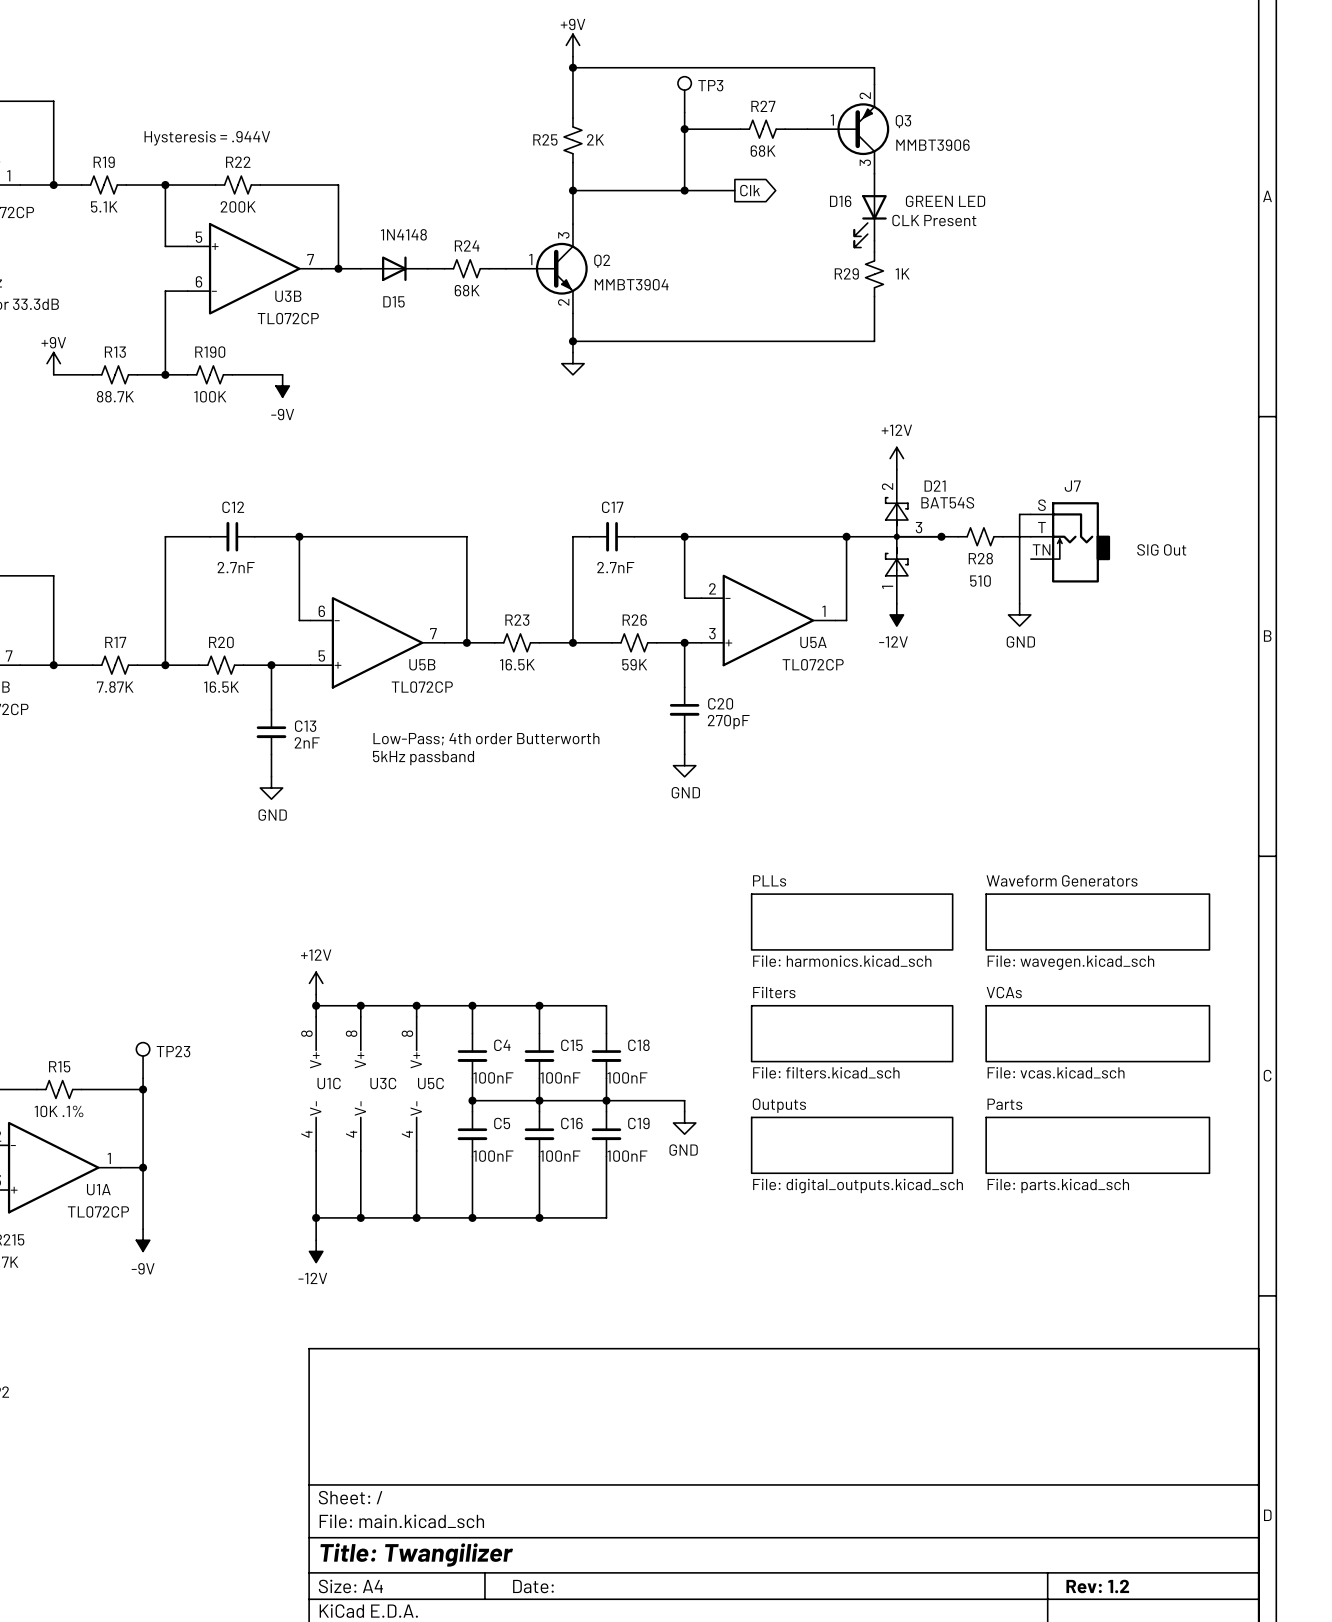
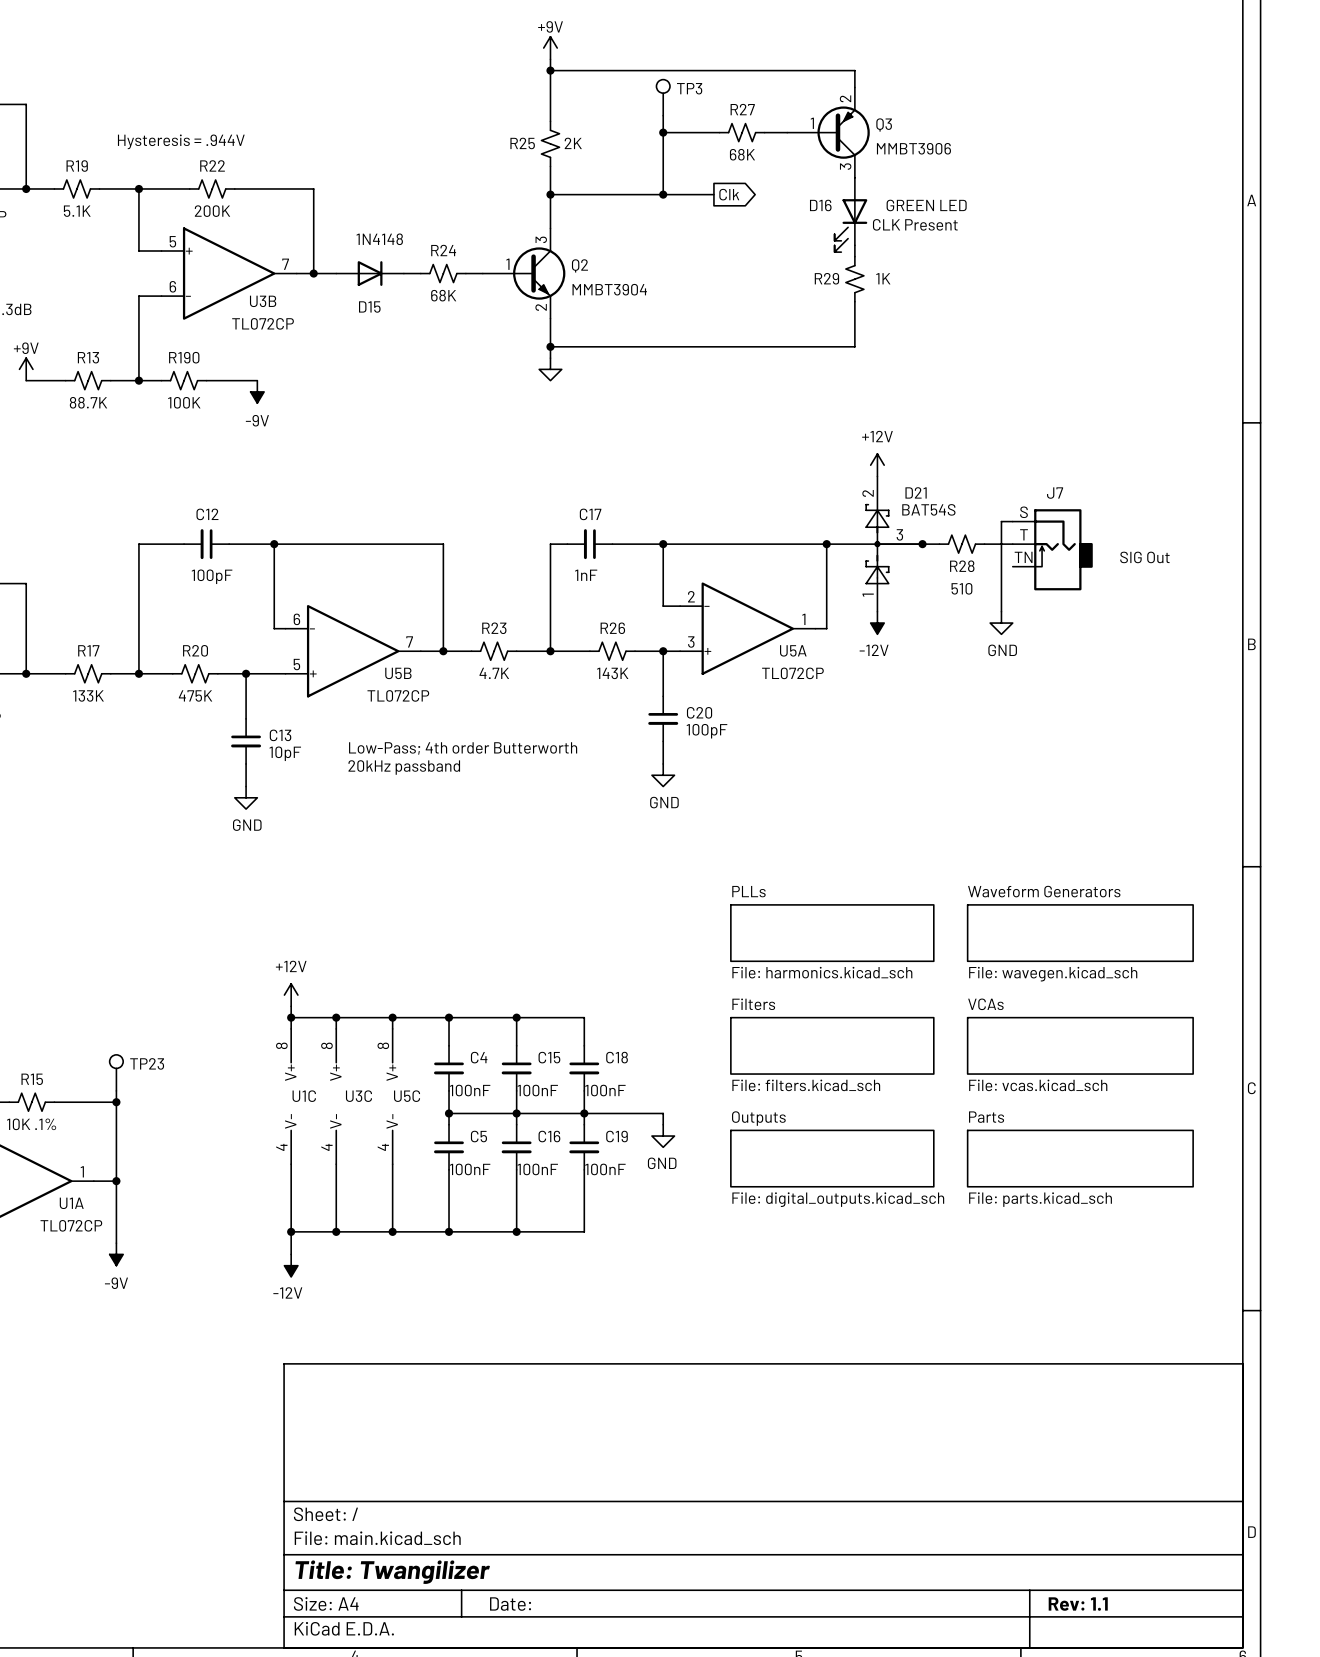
C12 value: 2.7nF (236, 567) -> 100pF (212, 576)
C17 value: 2.7nF (615, 567) -> 1nF (586, 575)
R23 value: 16.5K (517, 664) -> 4.7K (494, 673)
R26 value: 59K (634, 664) -> 143K (612, 673)
R17 value: 7.87K (115, 687) -> 133K (88, 695)
R20 value: 16.5K (221, 687) -> 475K (195, 695)
C20 value: 270pF (728, 722) -> 100pF (707, 731)
C13 value: 2nF (307, 742) -> 10pF (285, 753)
text: 5kHz passband (423, 758) -> 20kHz passband (404, 767)
title block: Rev: 1.2 (1097, 1586) -> Rev: 1.1 (1078, 1604)

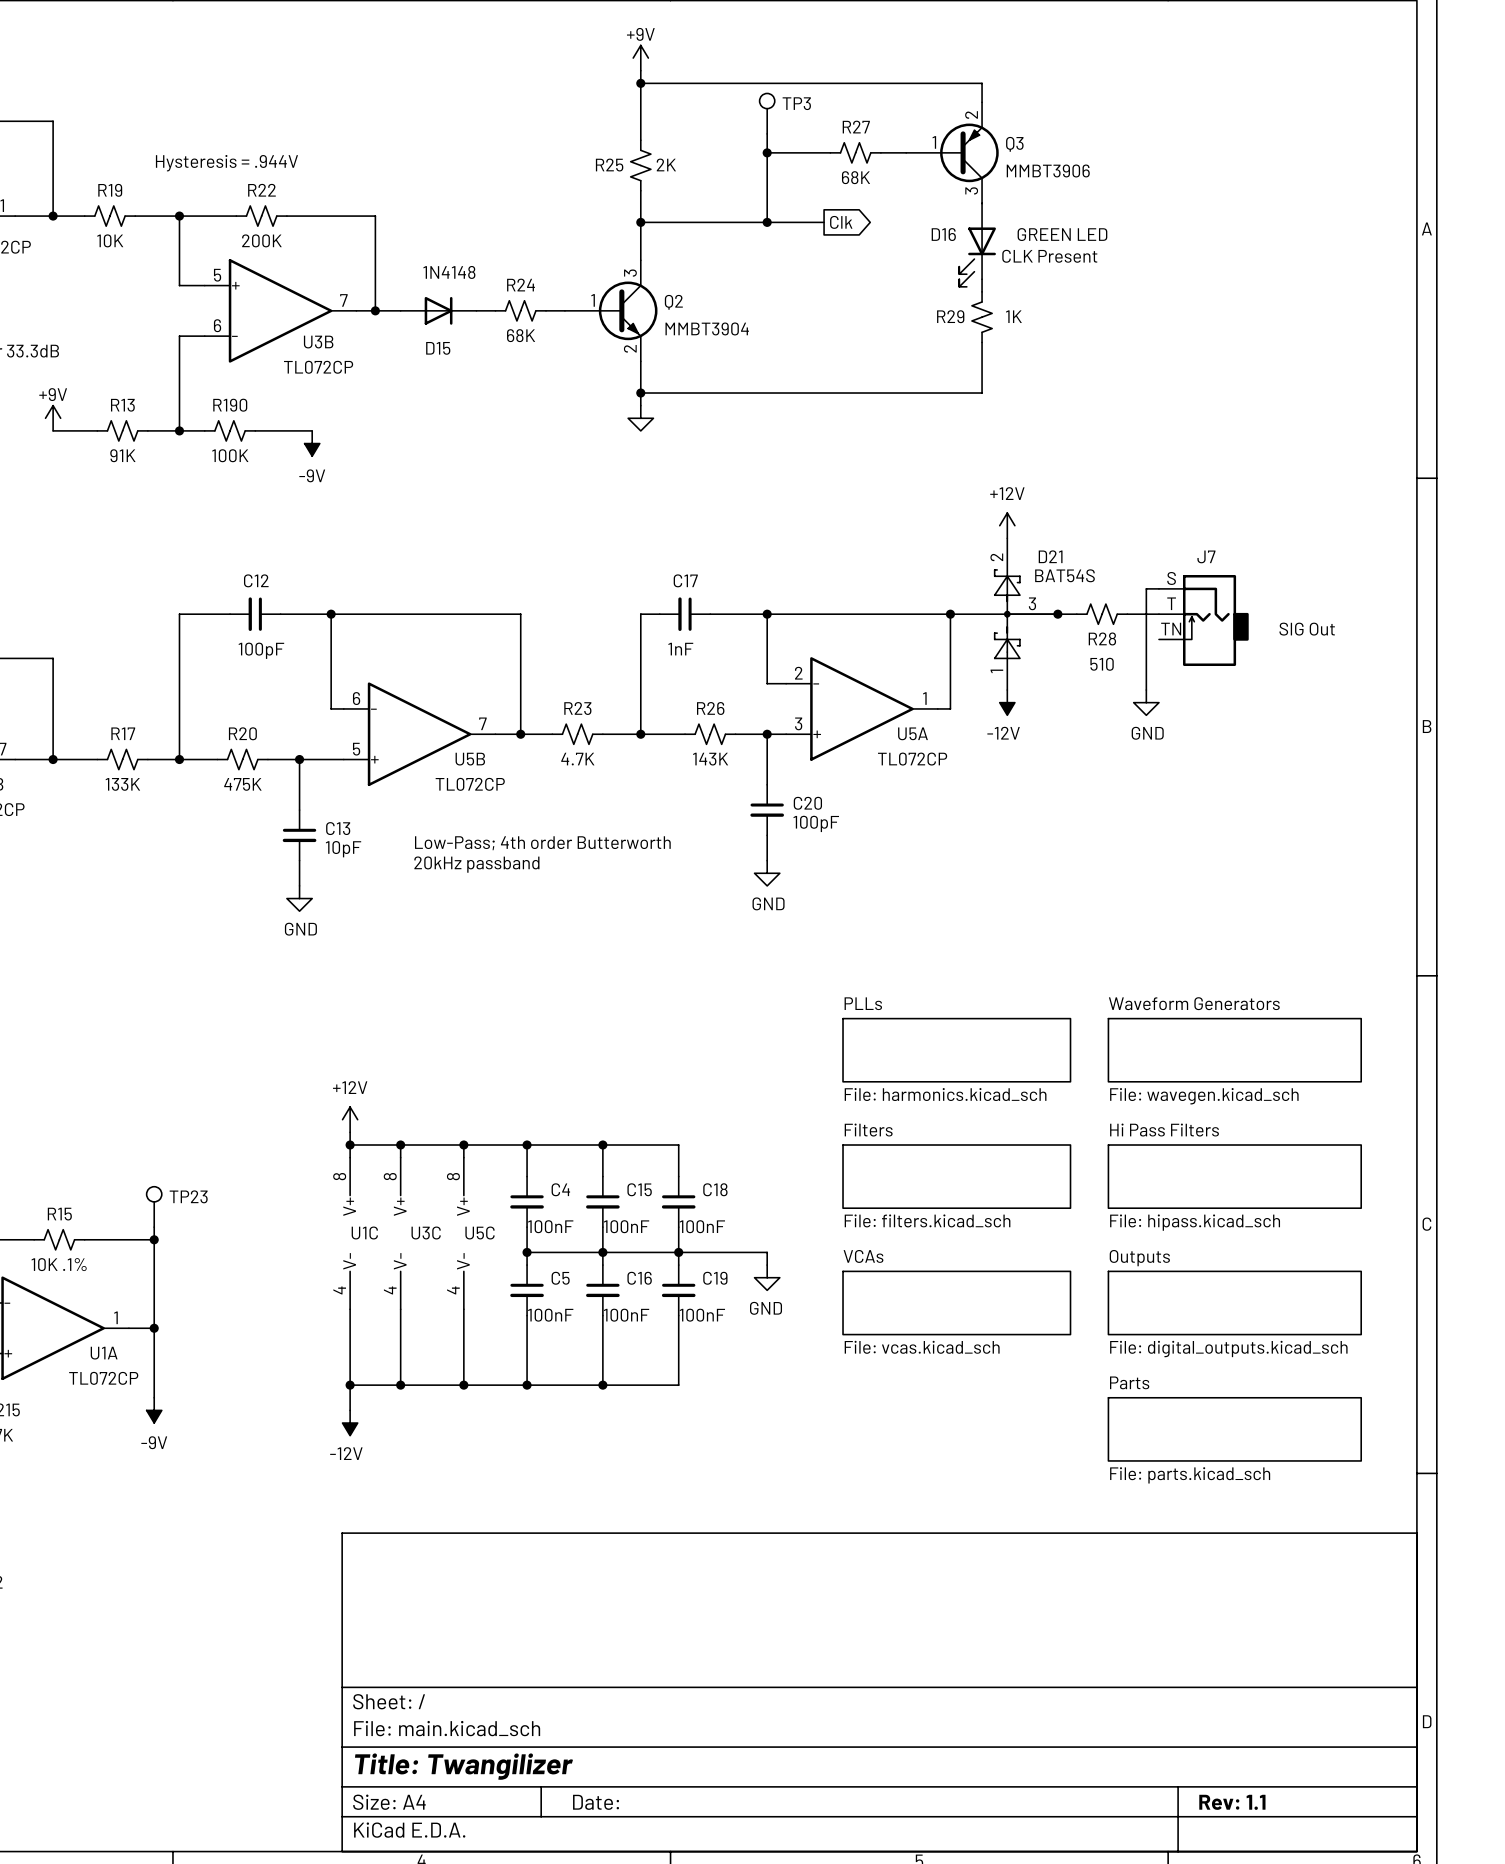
R19 value: 5.1K (77, 211) -> 10K (110, 240)
R13 value: 88.7K (88, 402) -> 91K (122, 455)
sheet VCAs name: VCAs (985, 1004) -> Hi Pass Filters (1164, 1130)
sheet VCAs value: File: vcas.kicad_sch (1038, 1085) -> File: hipass.kicad_sch (1195, 1222)
sheet Parts name: Parts (986, 1117) -> Outputs (1139, 1258)
sheet Outputs name: Outputs (758, 1118) -> VCAs (863, 1256)
sheet Outputs value: File: digital_outputs.kicad_sch (838, 1199) -> File: vcas.kicad_sch (922, 1347)
sheet Parts value: File: parts.kicad_sch (1040, 1199) -> File: digital_outputs.kicad_sch (1228, 1349)
sheet Parts: none -> File: parts.kicad_sch (1234, 1429)

